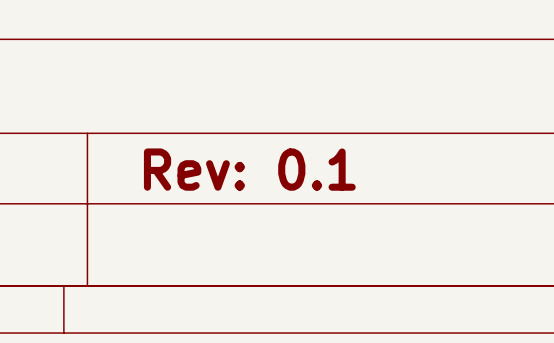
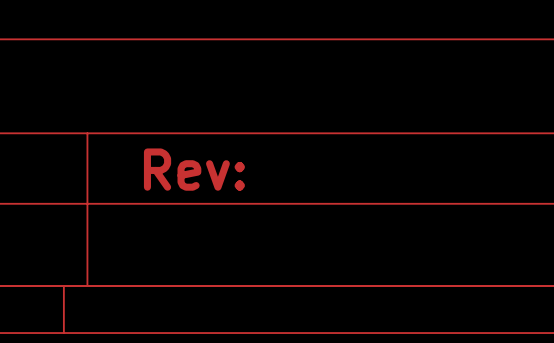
title block: Rev: 0.1 (249, 169) -> Rev: (194, 169)

